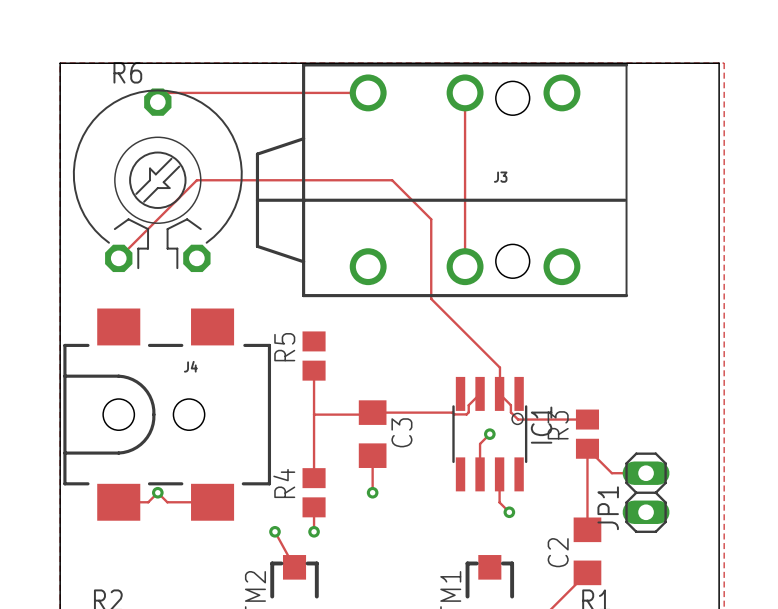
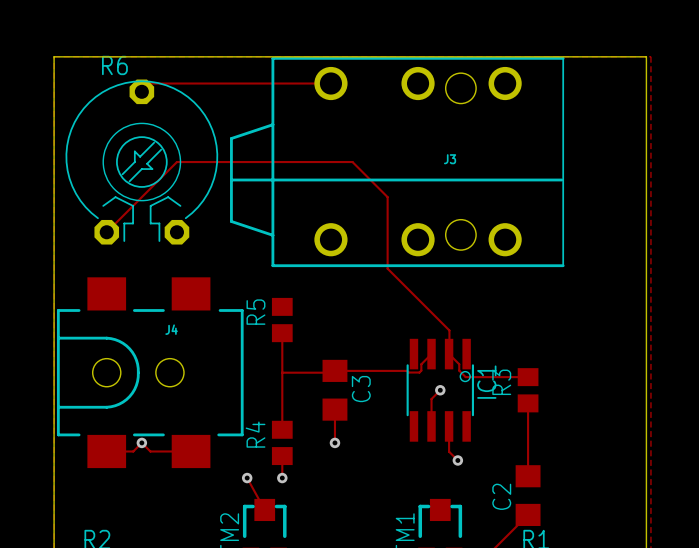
track: (465, 92) (465, 266) -> none
track: (587, 448) (611, 473) (646, 473) -> none
JP1: (646, 492) -> none

